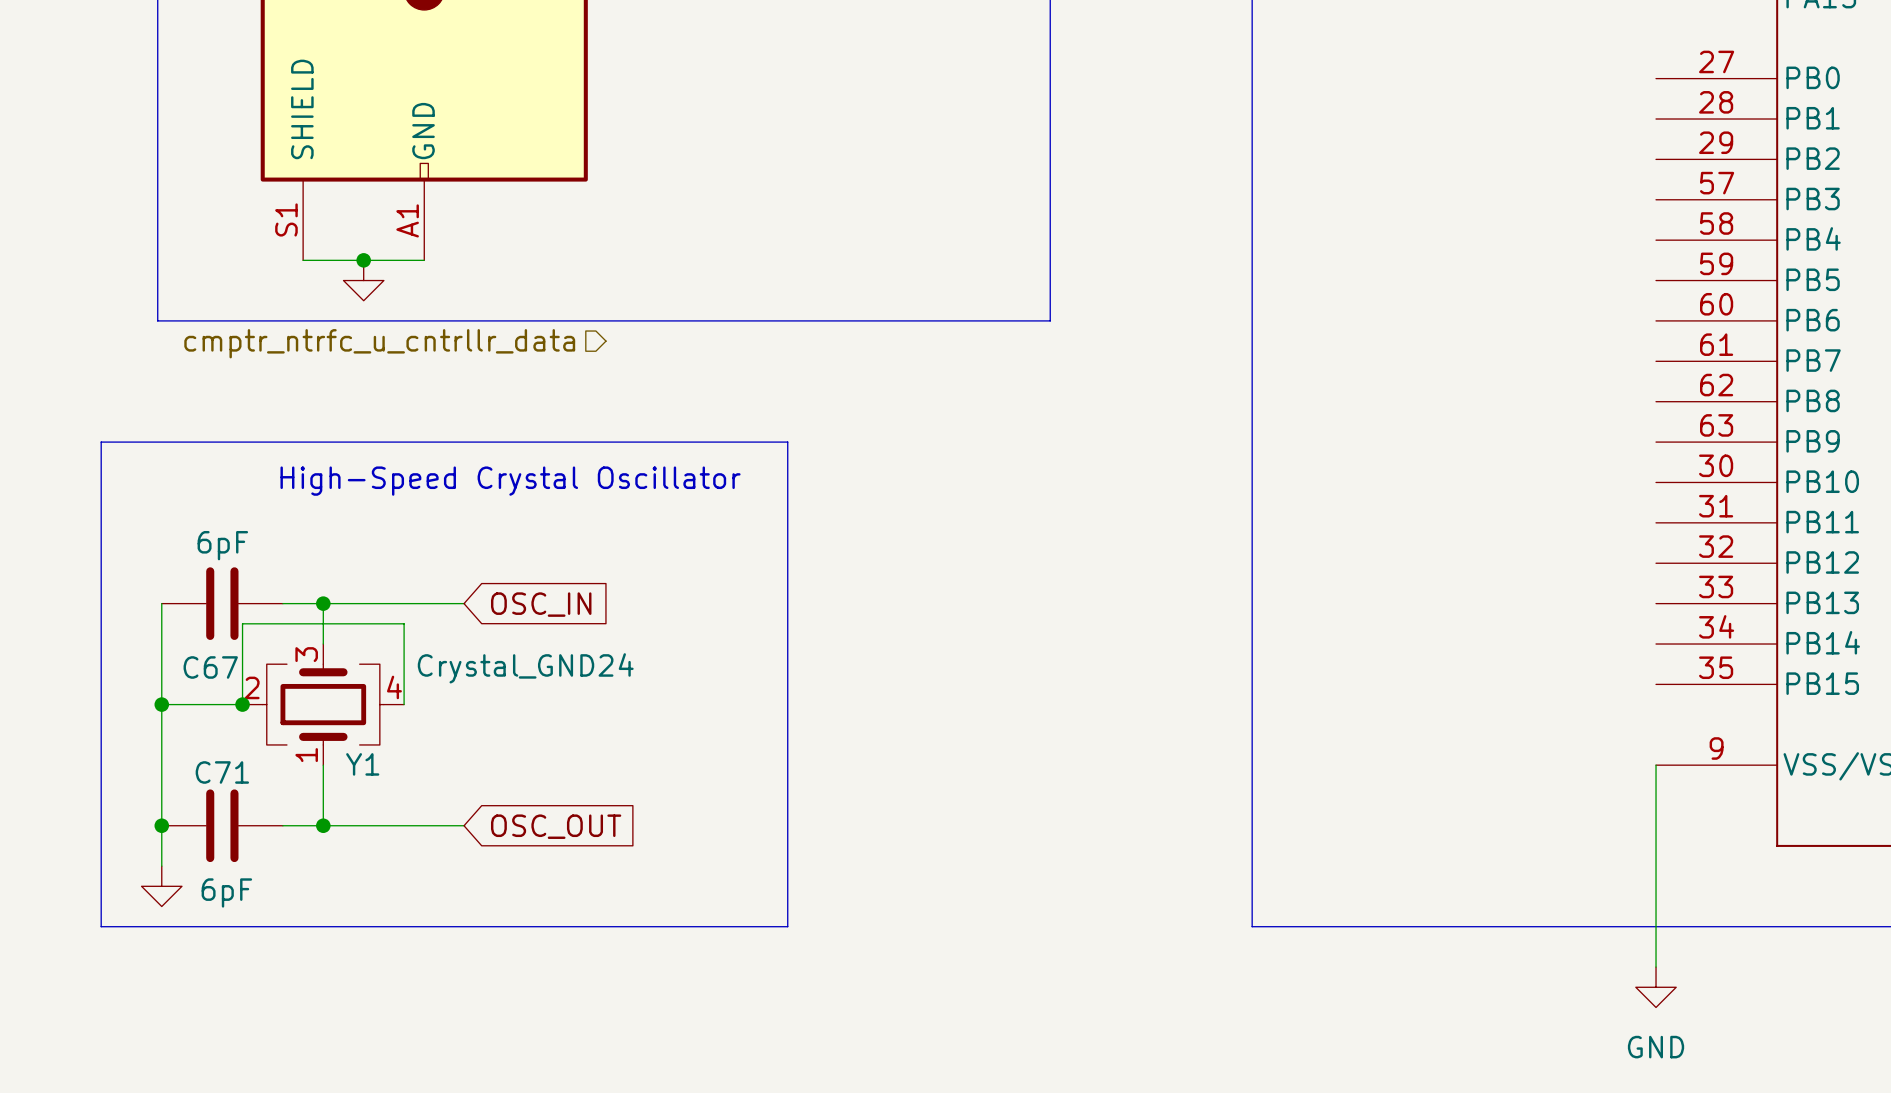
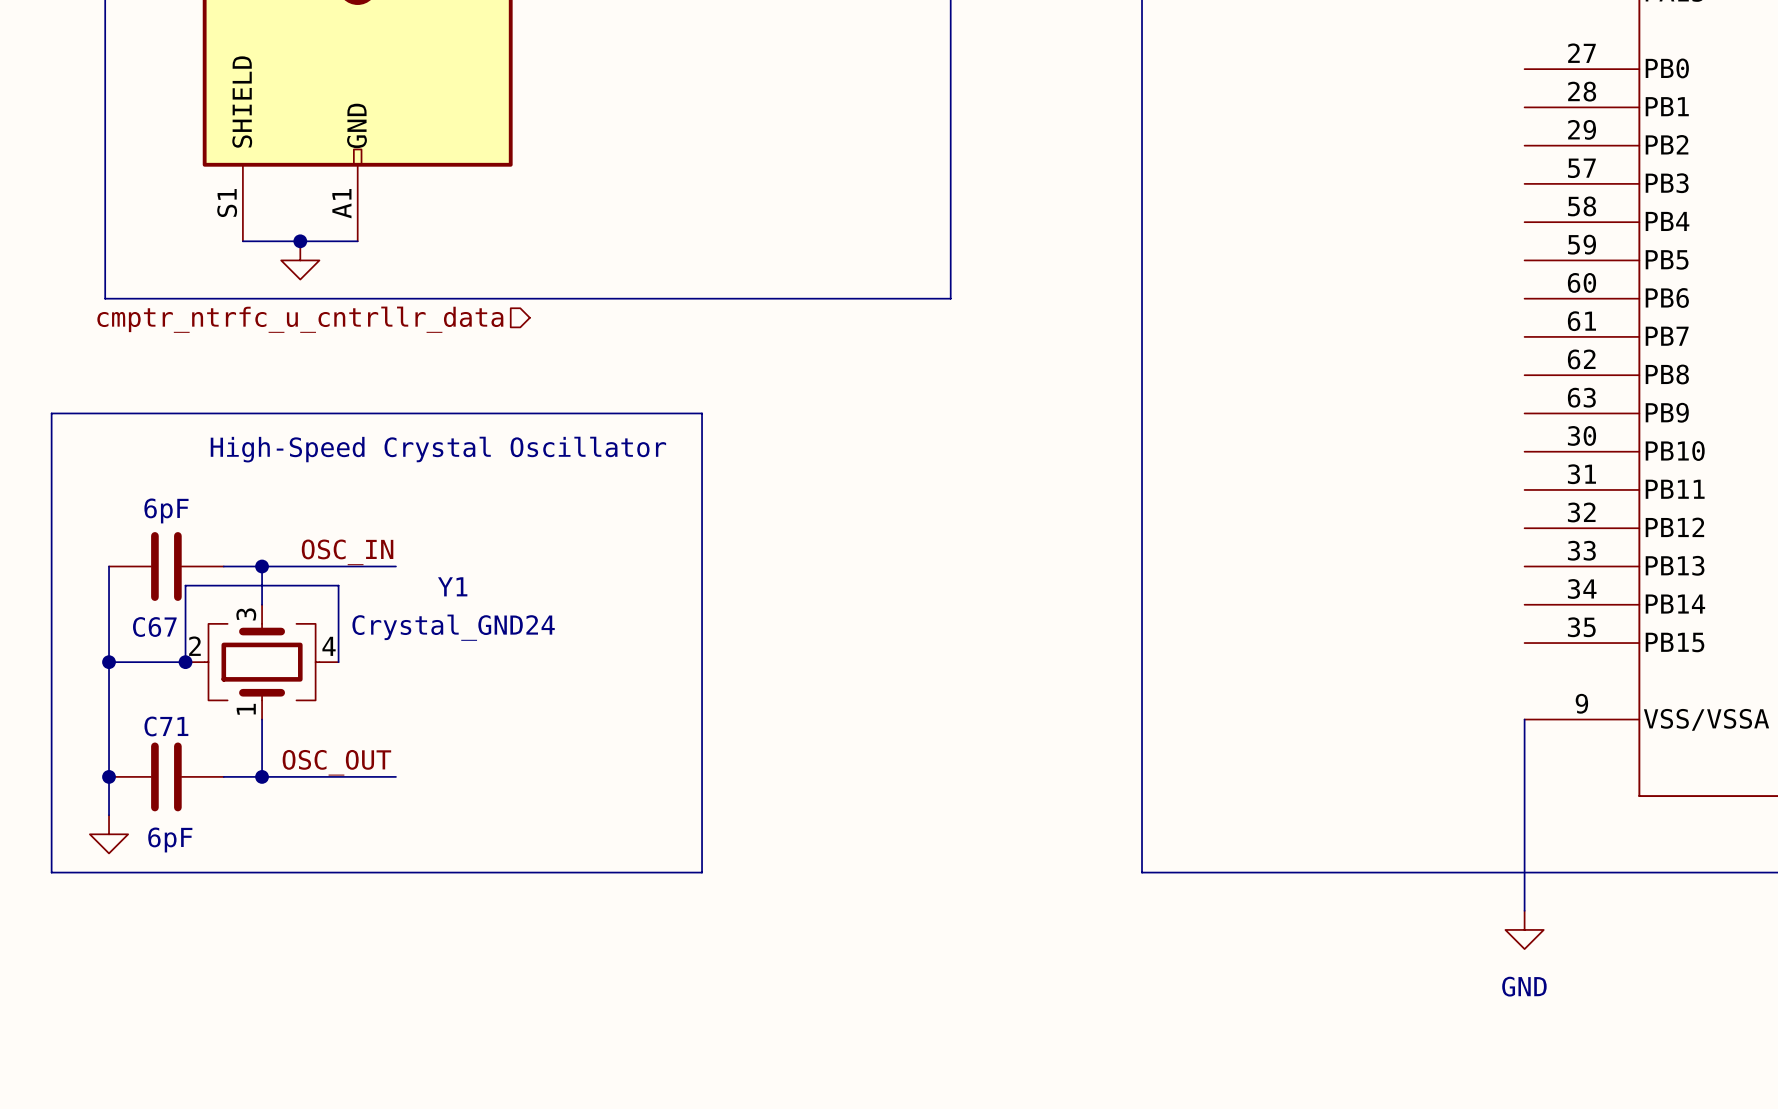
label: none -> OSC_IN (347, 552)
global label: OSC_IN (541, 604) -> none
Y1 name position: Y1 (362, 764) -> Y1 (452, 586)
label: none -> OSC_OUT (336, 762)
global label: OSC_OUT (556, 826) -> none

